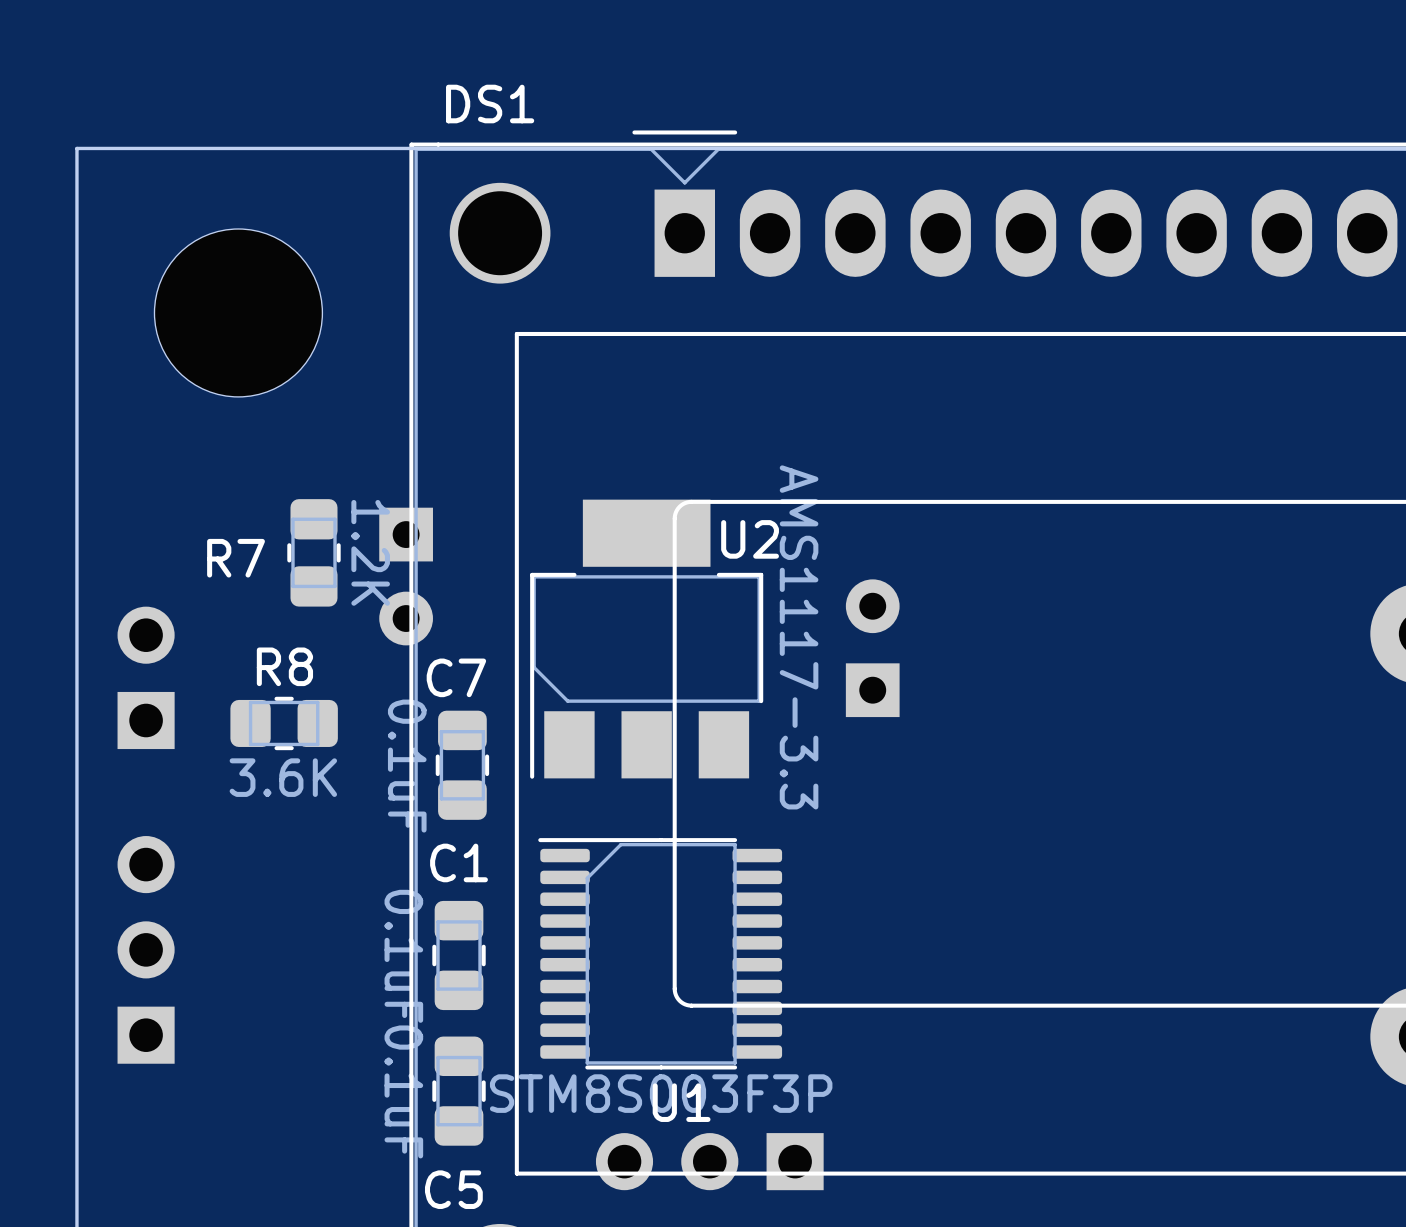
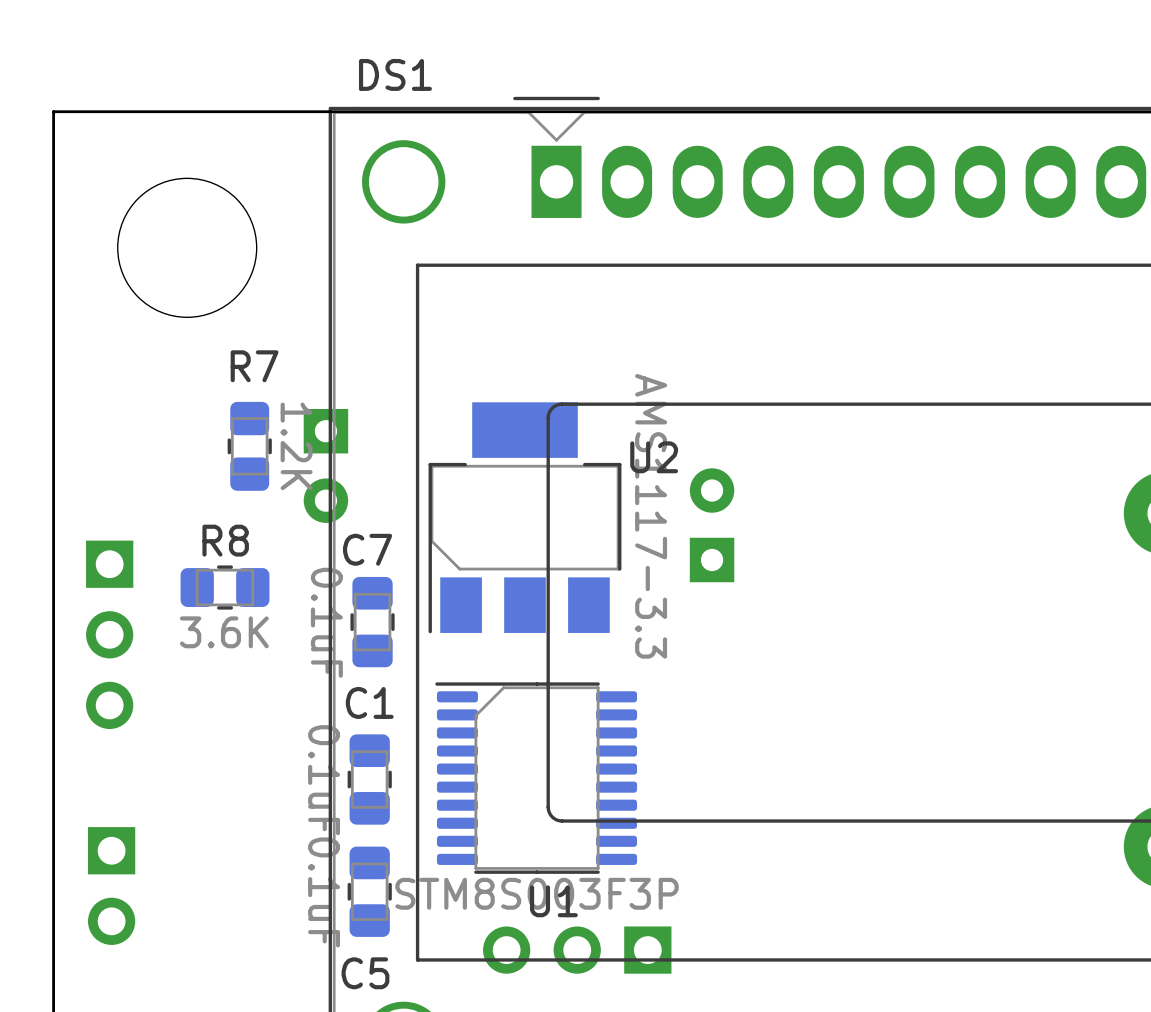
U2 name position: U2 (750, 539) -> U2 (654, 457)
R7 name position: R7 (236, 558) -> R7 (254, 366)
part rotation: 0° (146, 677) -> 180° (111, 886)
part position: (146, 677) -> (111, 886)
part rotation: 0° (146, 949) -> 180° (109, 634)
part position: (146, 949) -> (109, 634)

